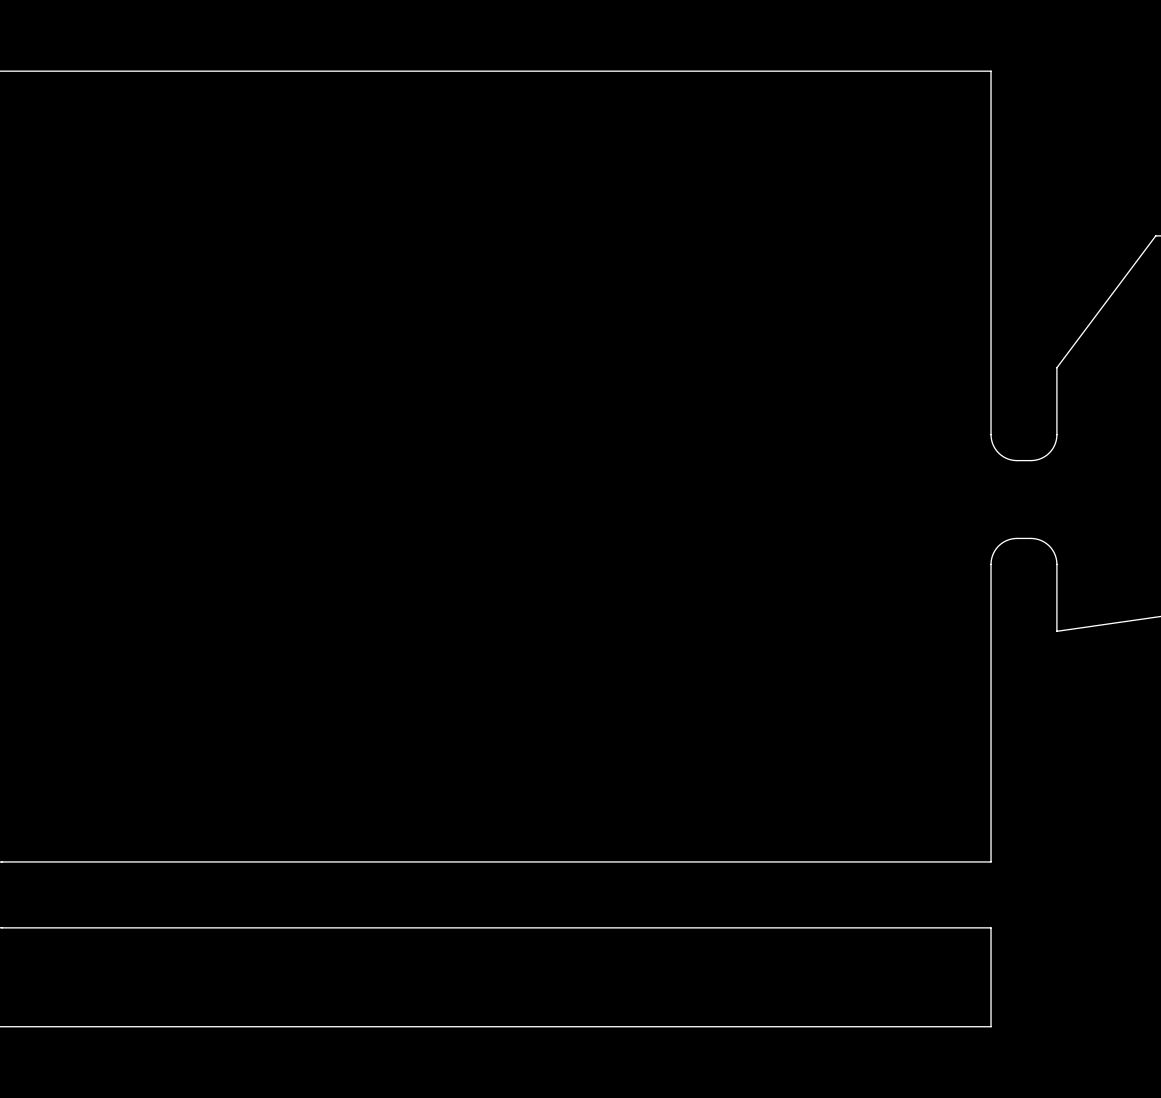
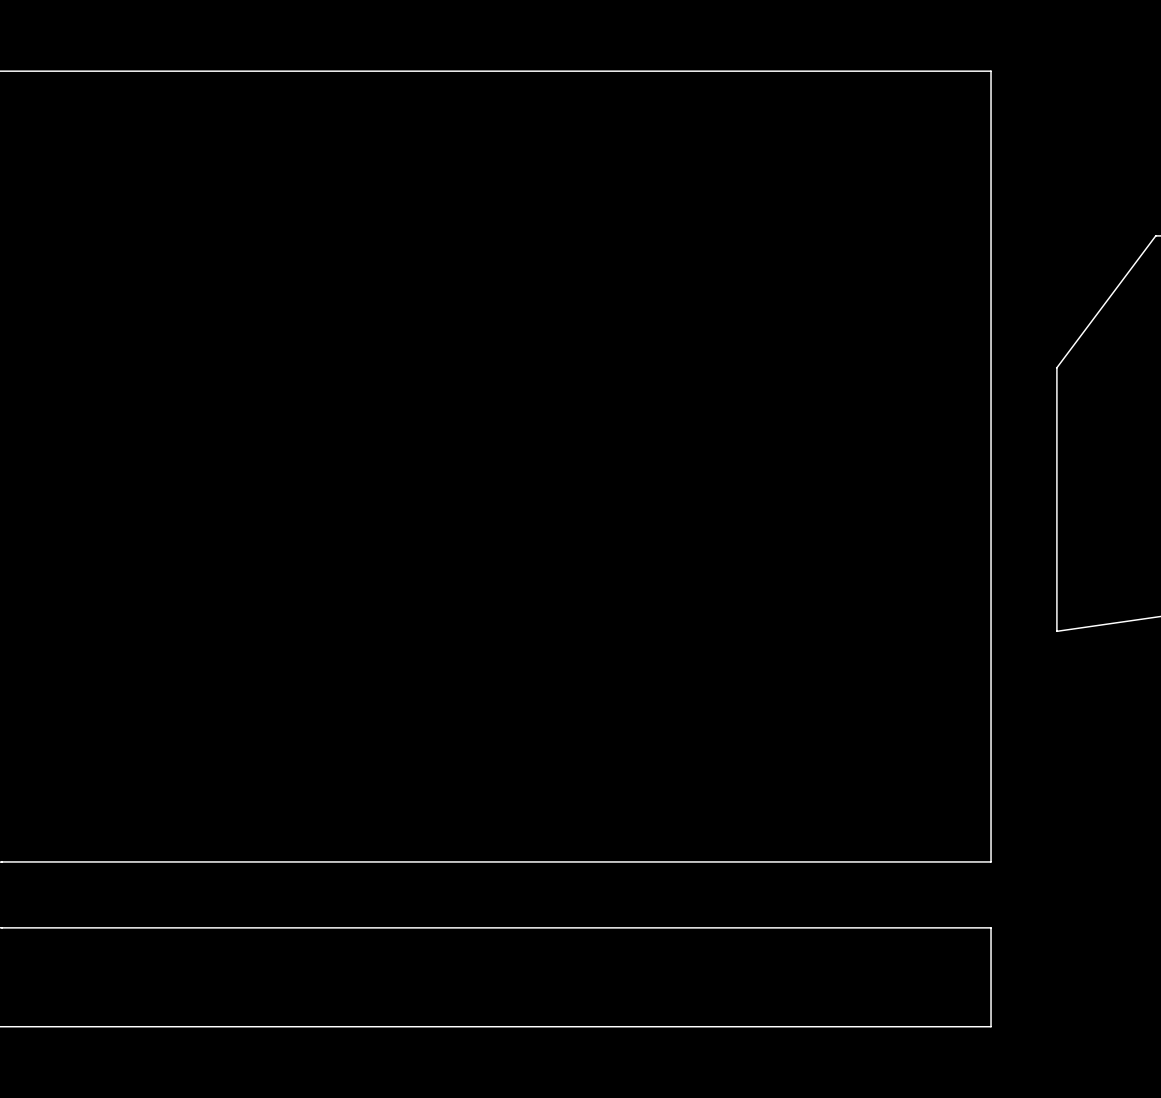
board edge: (991, 434) (993, 445) (998, 453) (1005, 458) (1016, 460) (1033, 460) (1044, 456) (1052, 448) (1056, 434) -> (991, 434) (991, 564)
board edge: (991, 564) (992, 555) (998, 546) (1008, 539) (1016, 538) (1033, 538) (1044, 542) (1052, 550) (1056, 564) -> (1056, 434) (1056, 564)

